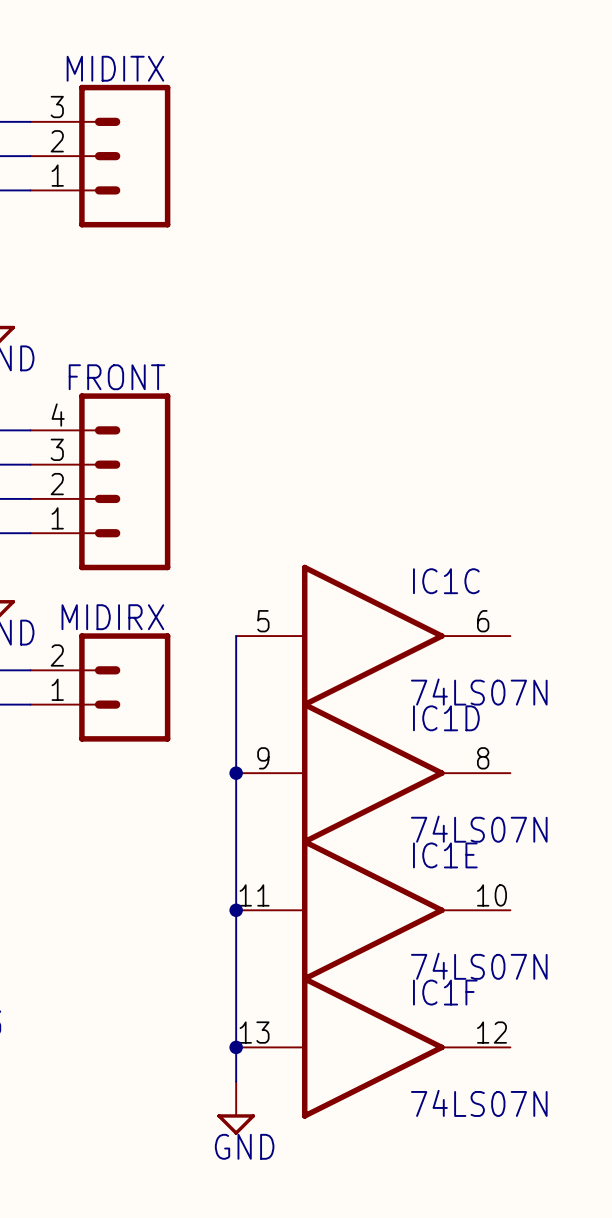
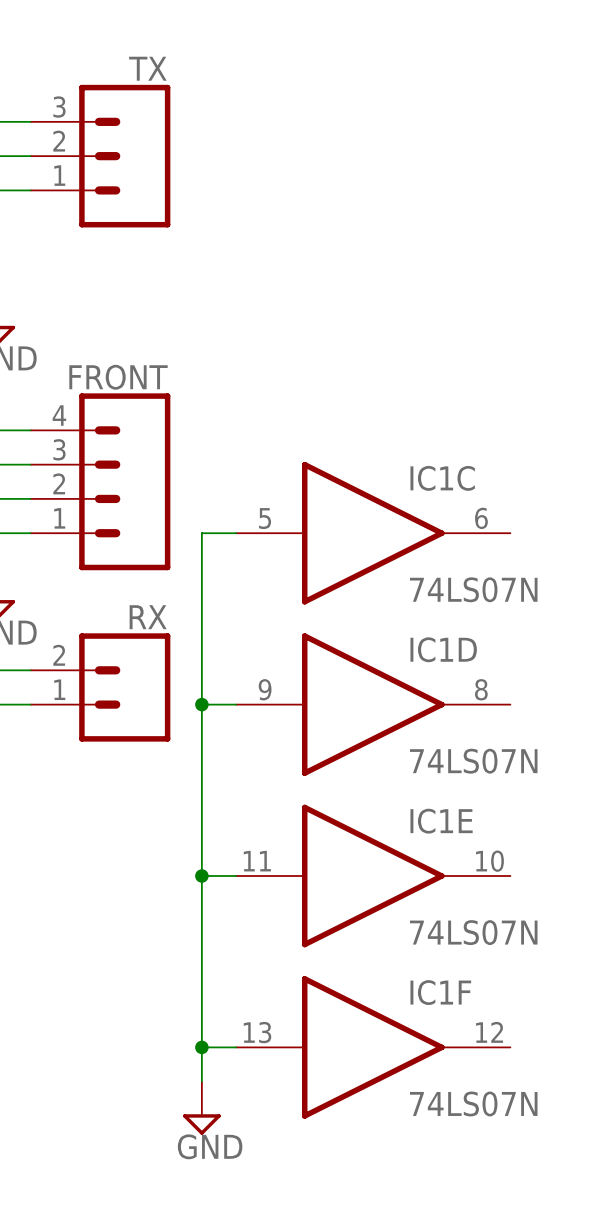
MIDITX name: MIDITX (115, 68) -> TX (147, 68)
wire: none -> (236, 533) (201, 533) (201, 1081)
MIDIRX name: MIDIRX (112, 617) -> RX (148, 617)
wire: (236, 636) (236, 1081) -> none
IC1C position: (373, 636) -> (373, 533)
wire: none -> (201, 704) (236, 704)
junction: none -> (201, 704)
junction: (236, 773) -> none
IC1D position: (373, 773) -> (373, 704)
wire: none -> (201, 876) (236, 876)
junction position: (236, 910) -> (201, 876)
IC1E position: (373, 910) -> (373, 876)
wire: none -> (201, 1047) (236, 1047)
junction position: (236, 1047) -> (201, 1047)
power symbol position: GND (236, 1108) -> GND (201, 1108)

